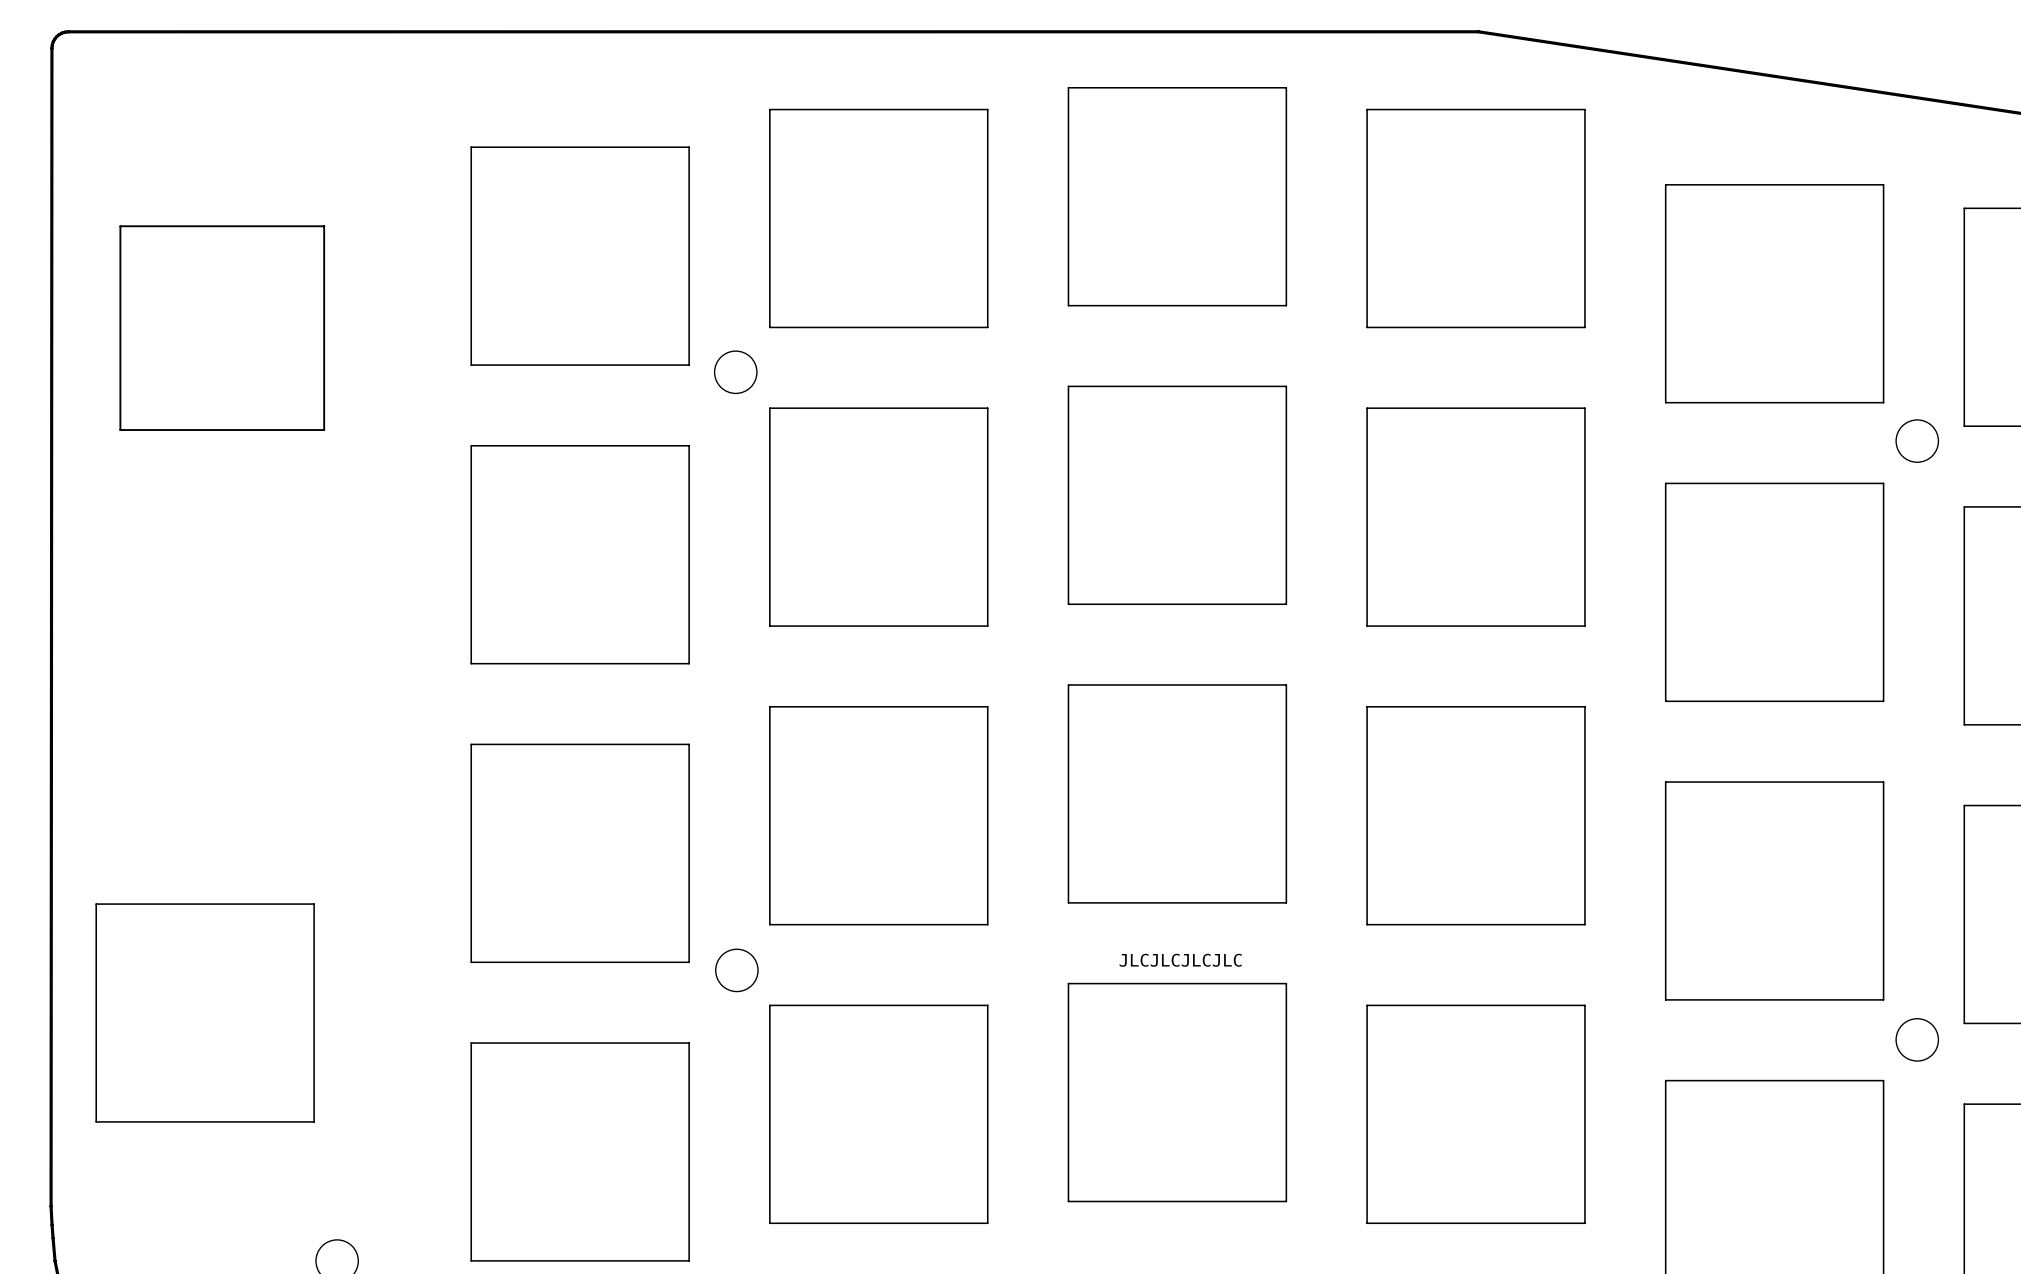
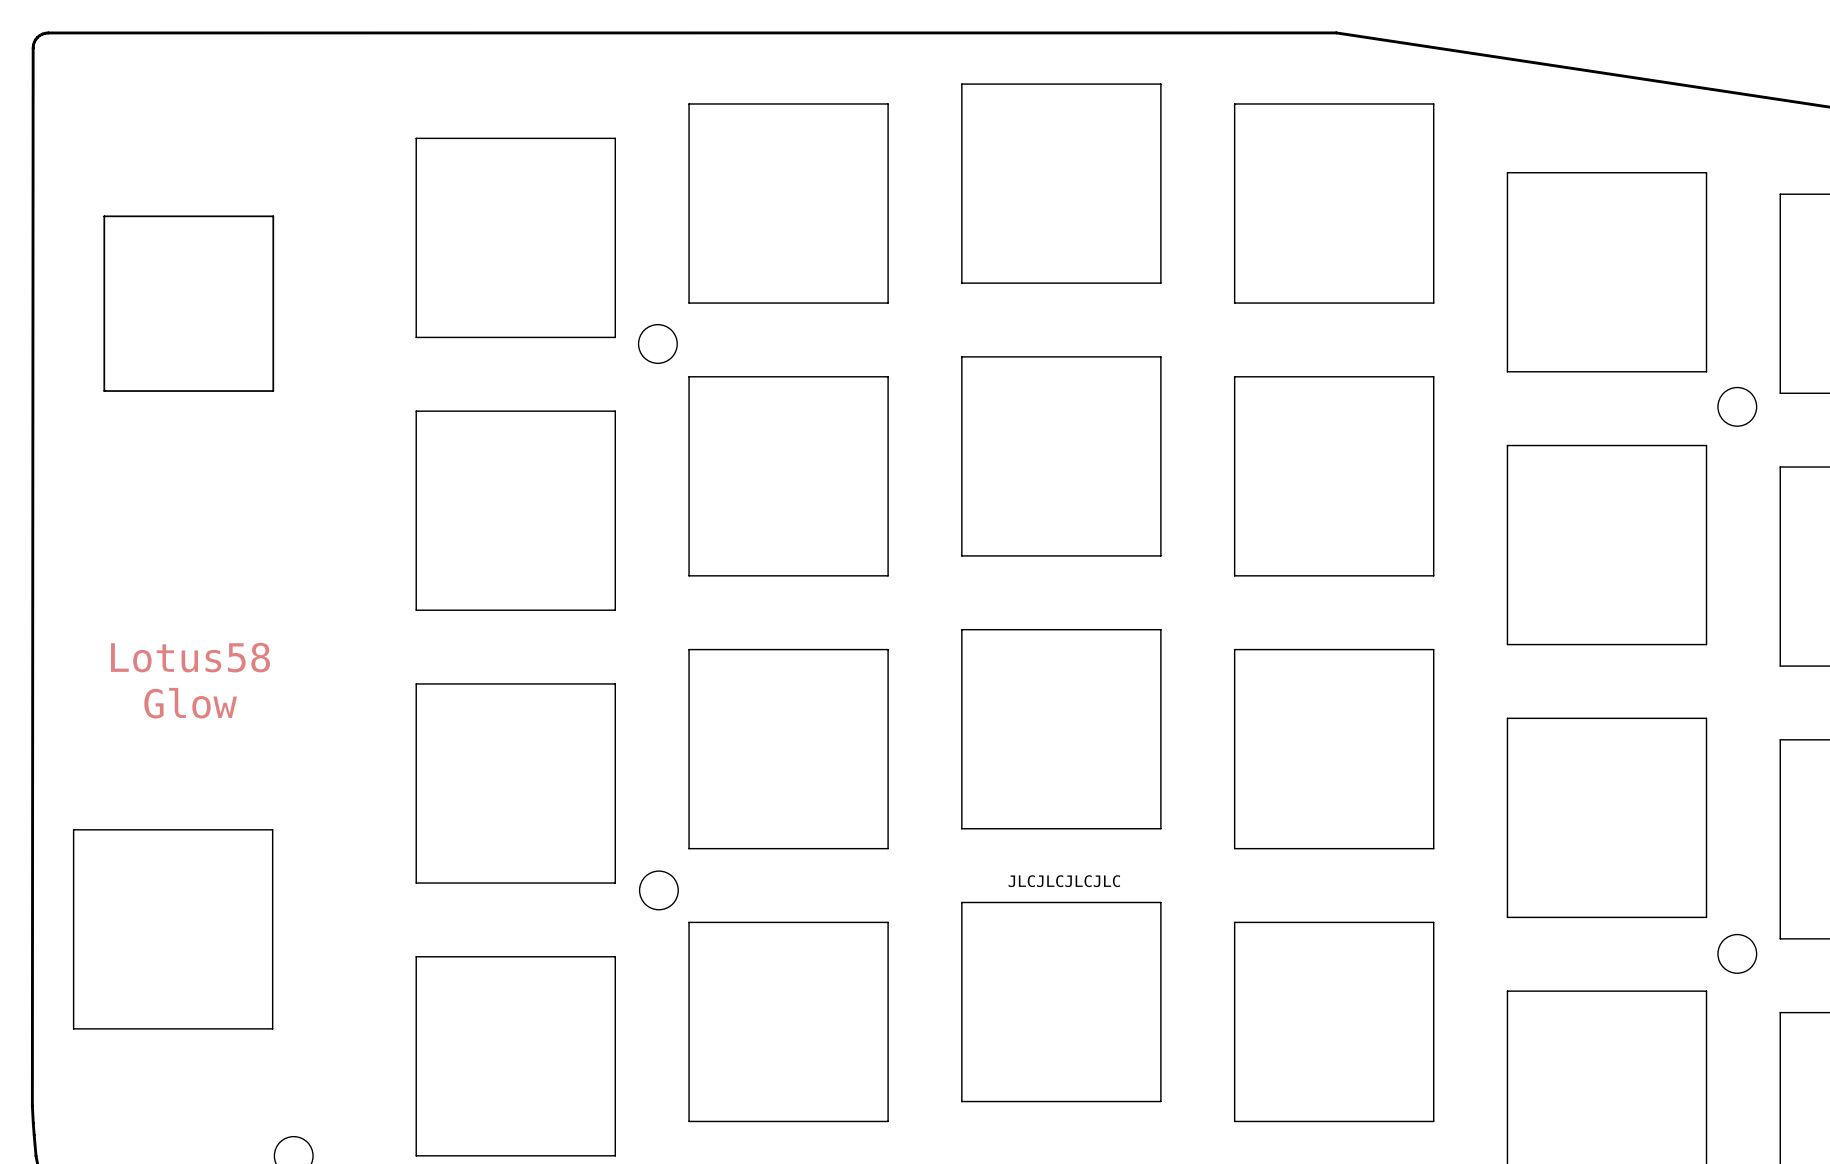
drawing shape: [119, 225, 326, 431] -> [103, 215, 275, 392]
text: none -> Lotus58 (190, 657)
text: none -> Glow (190, 703)

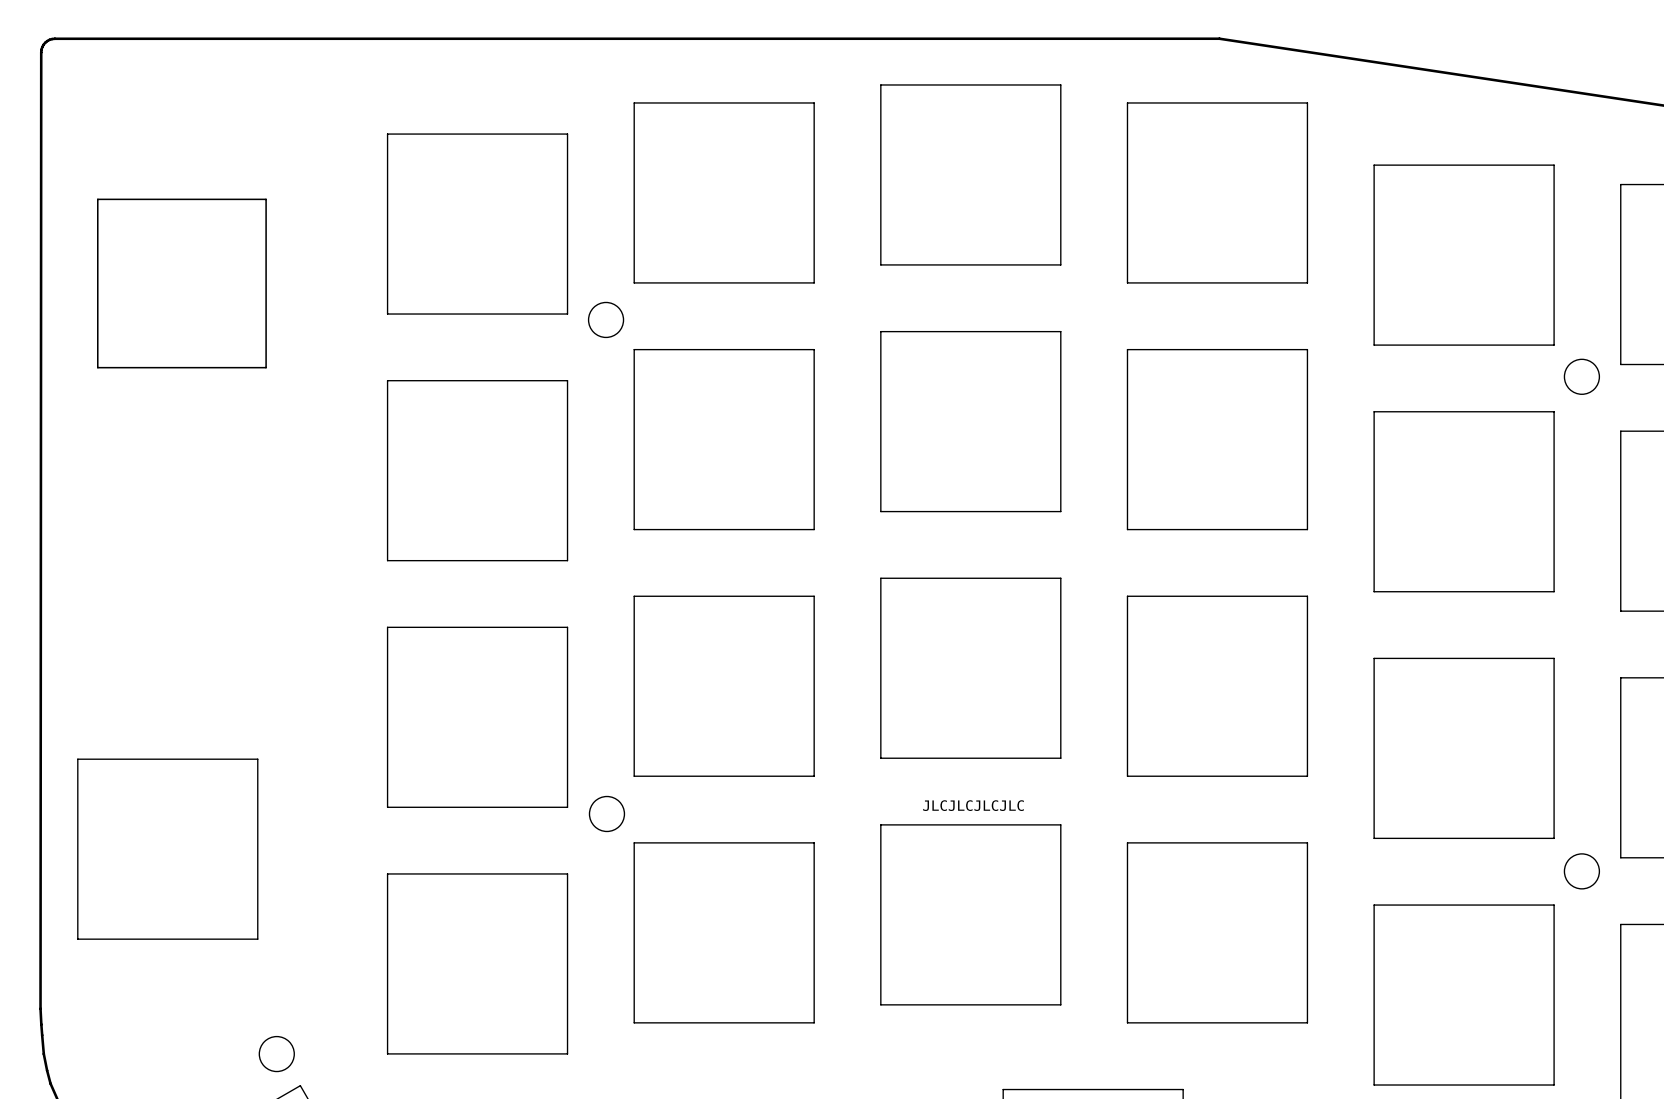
drawing shape: [103, 215, 275, 392] -> [97, 198, 267, 369]
text: Lotus58 (190, 657) -> none
text: Glow (190, 703) -> none

